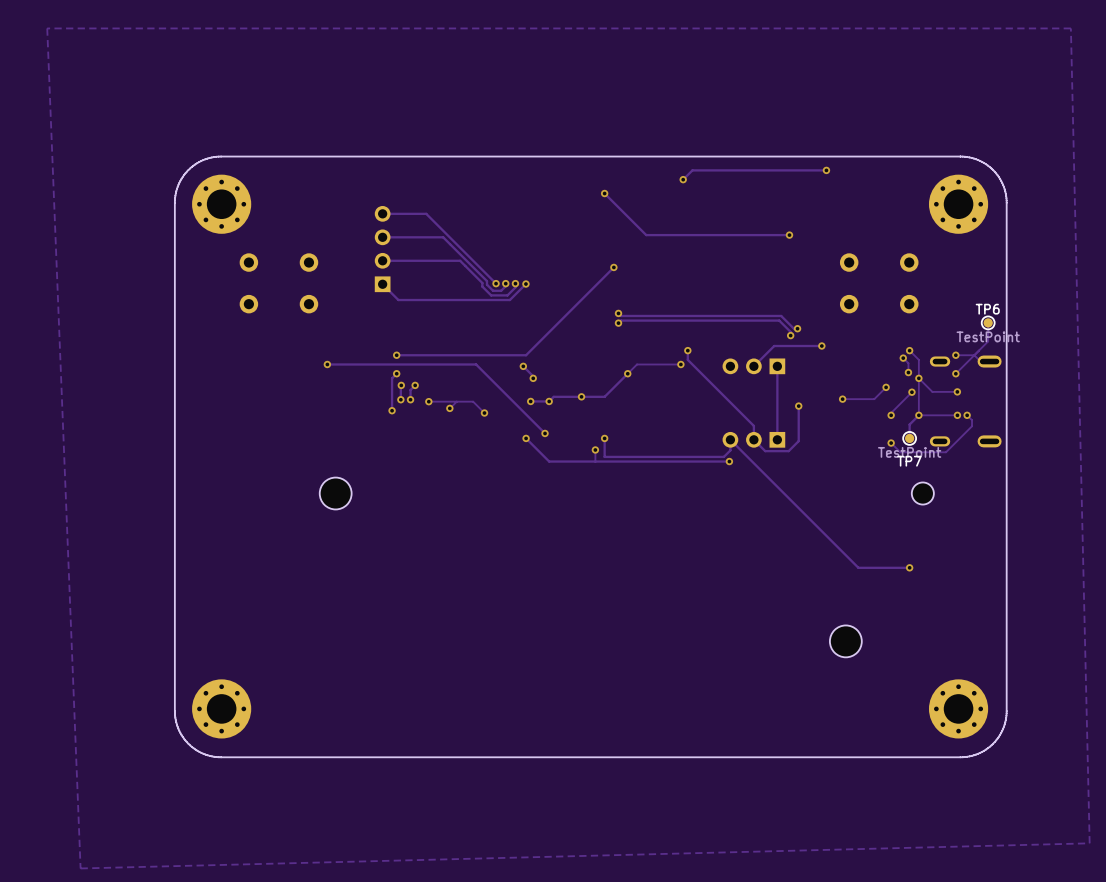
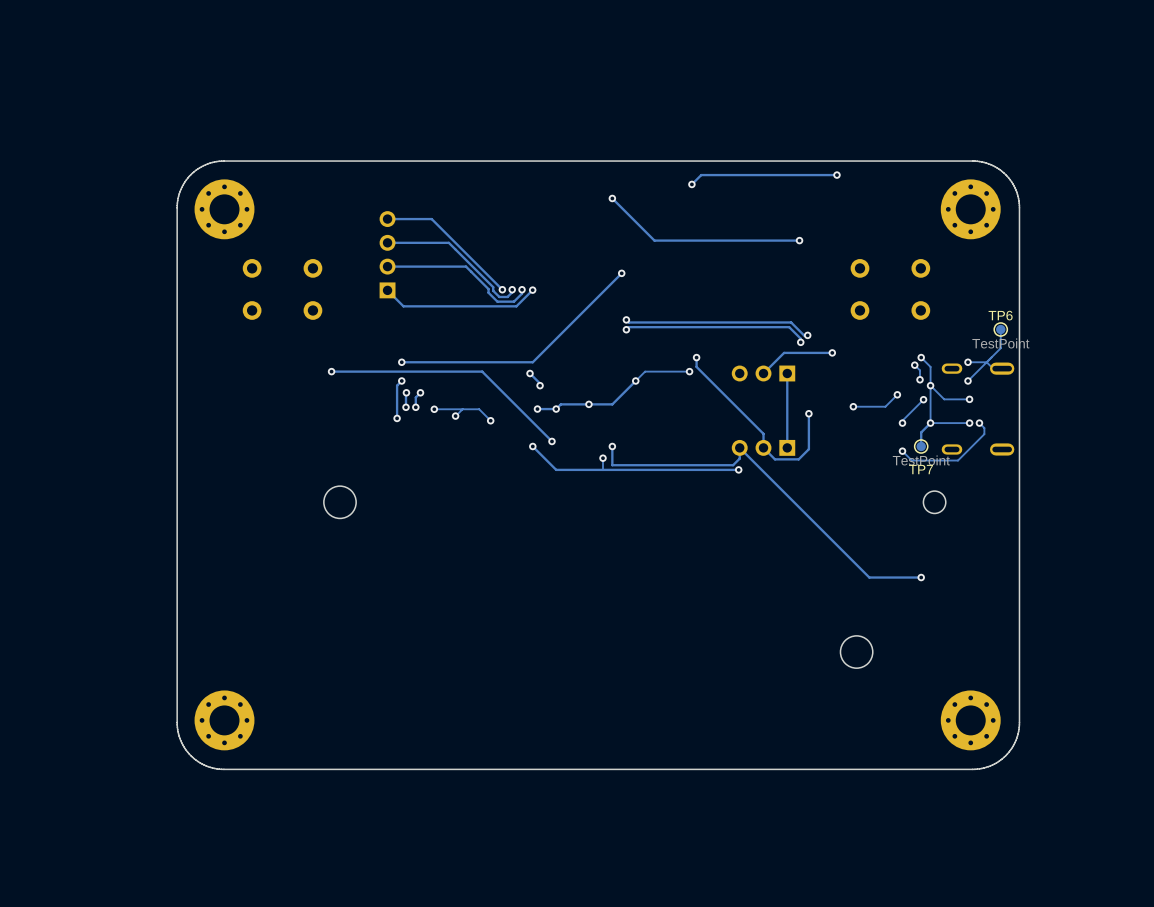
zone outline: (1070, 28) (1089, 843) (80, 868) (47, 28) (1070, 28) -> none

